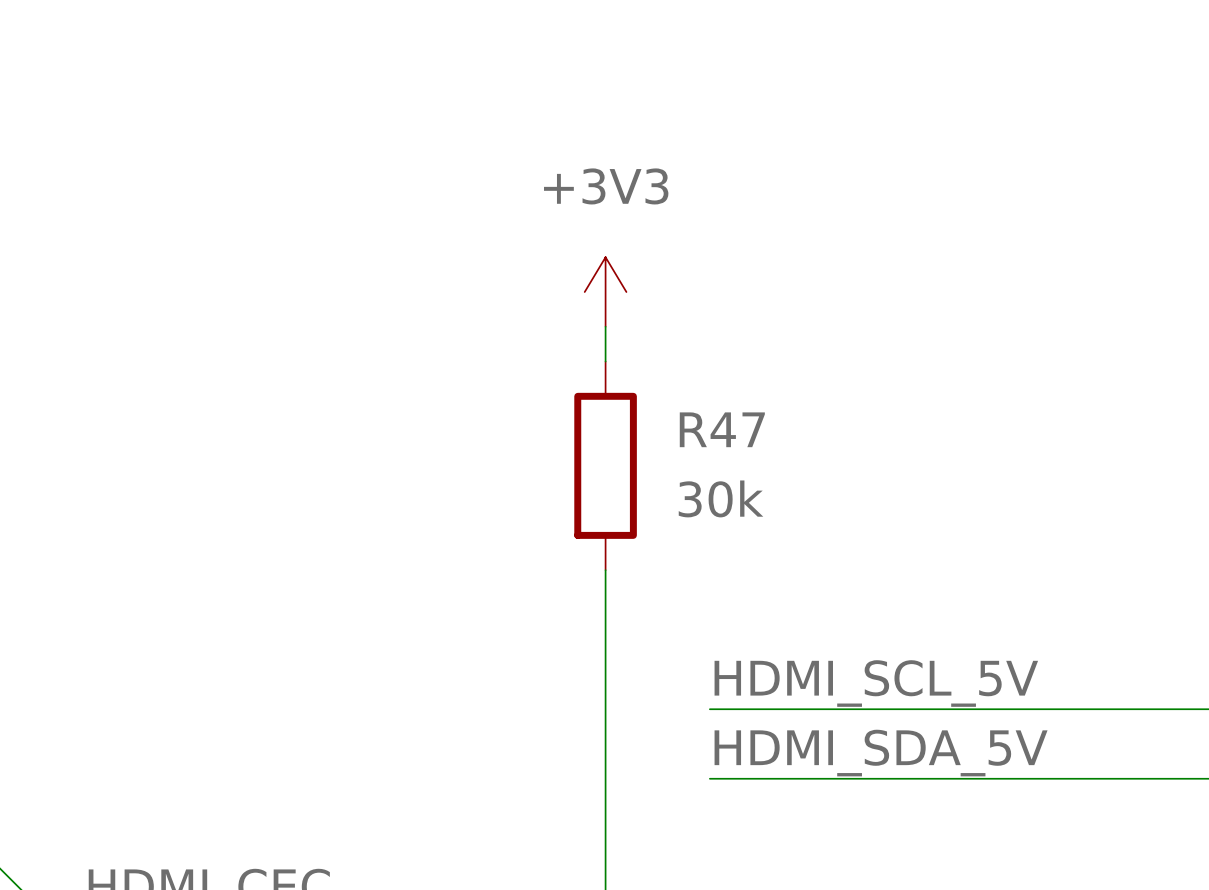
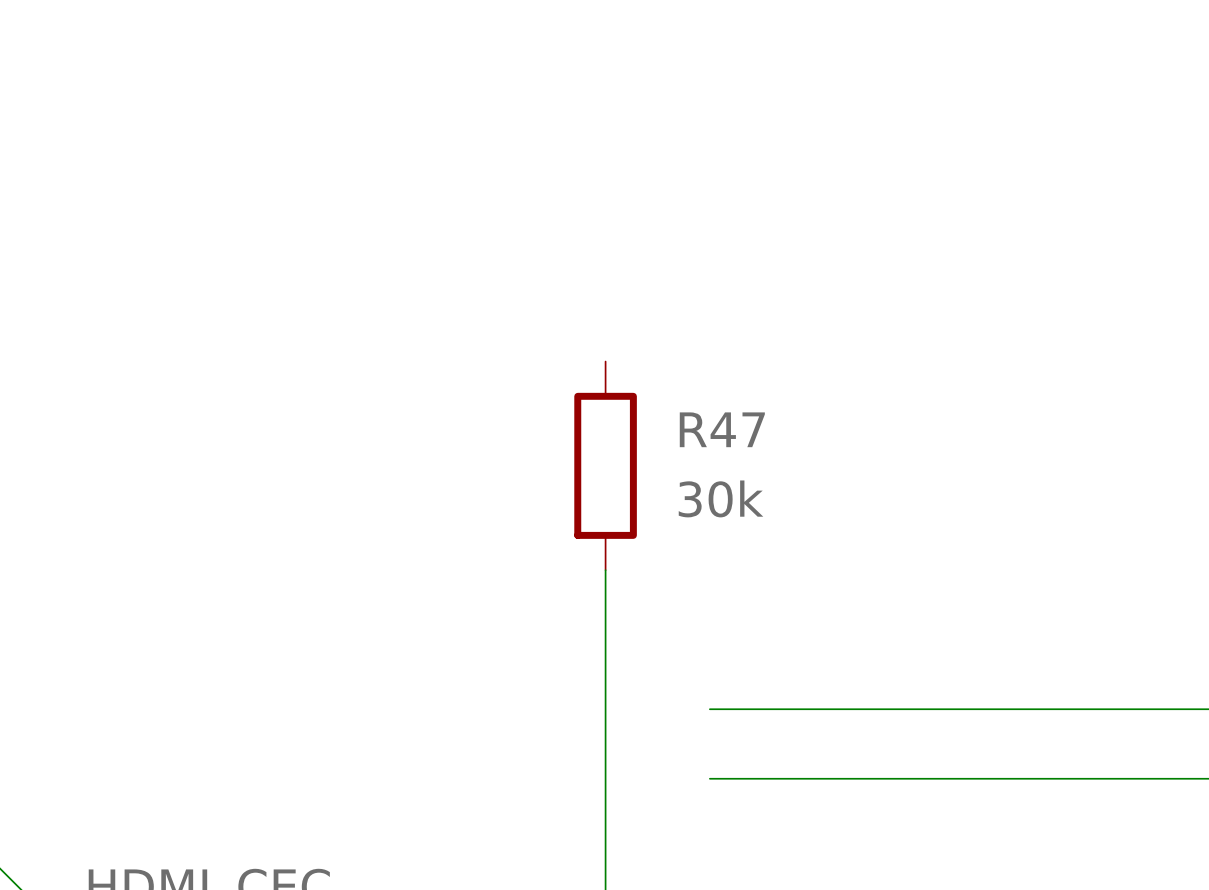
power symbol: +3V3 (605, 292) -> none
wire: (605, 326) (605, 361) -> none
label: HDMI_SCL_5V (876, 683) -> none
label: HDMI_SDA_5V (881, 753) -> none

